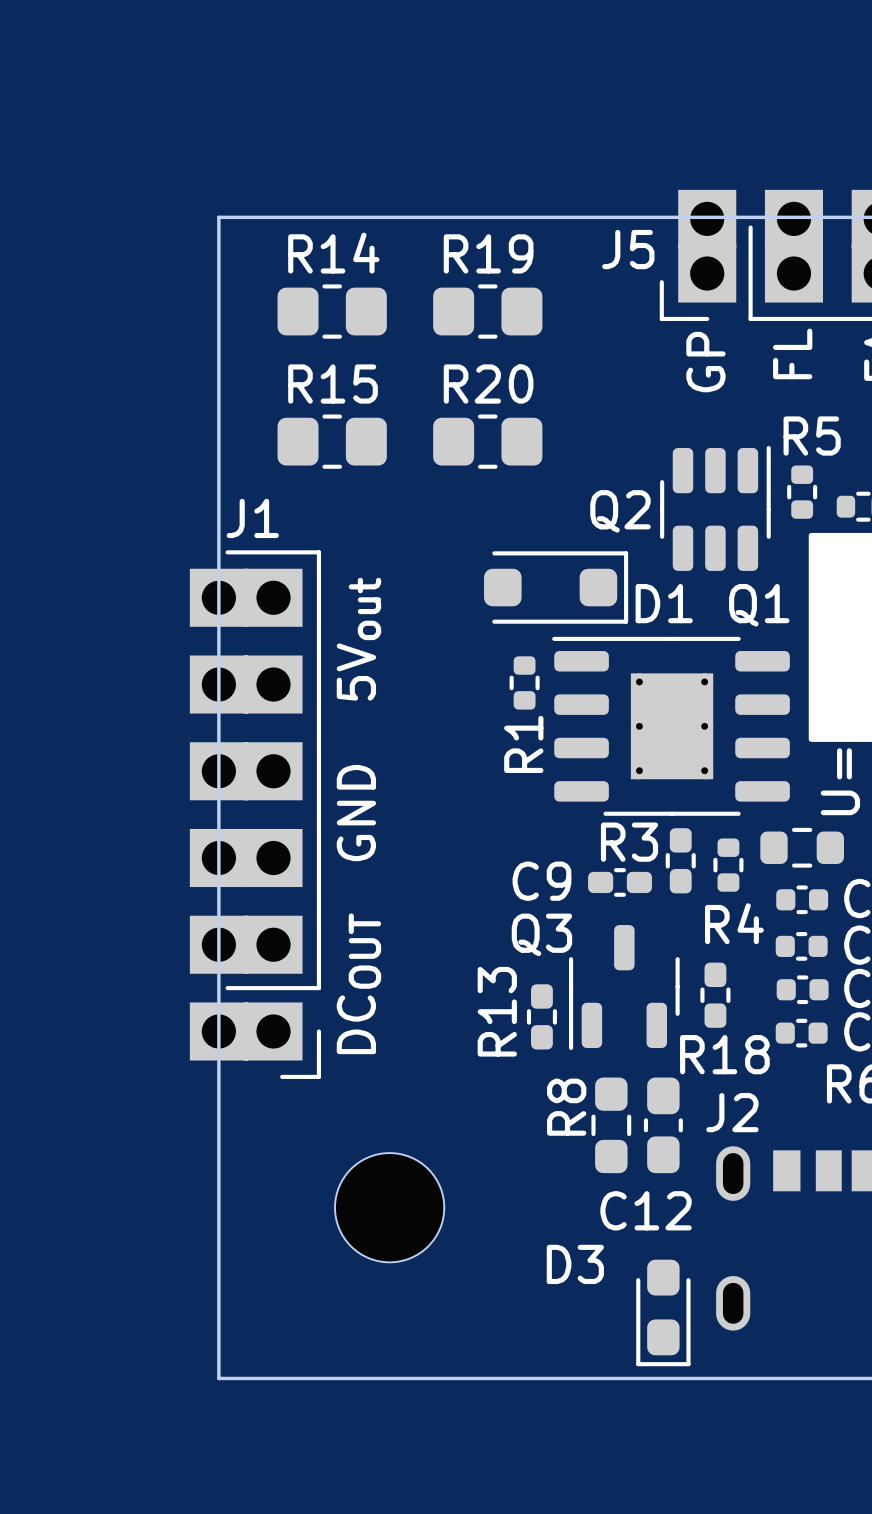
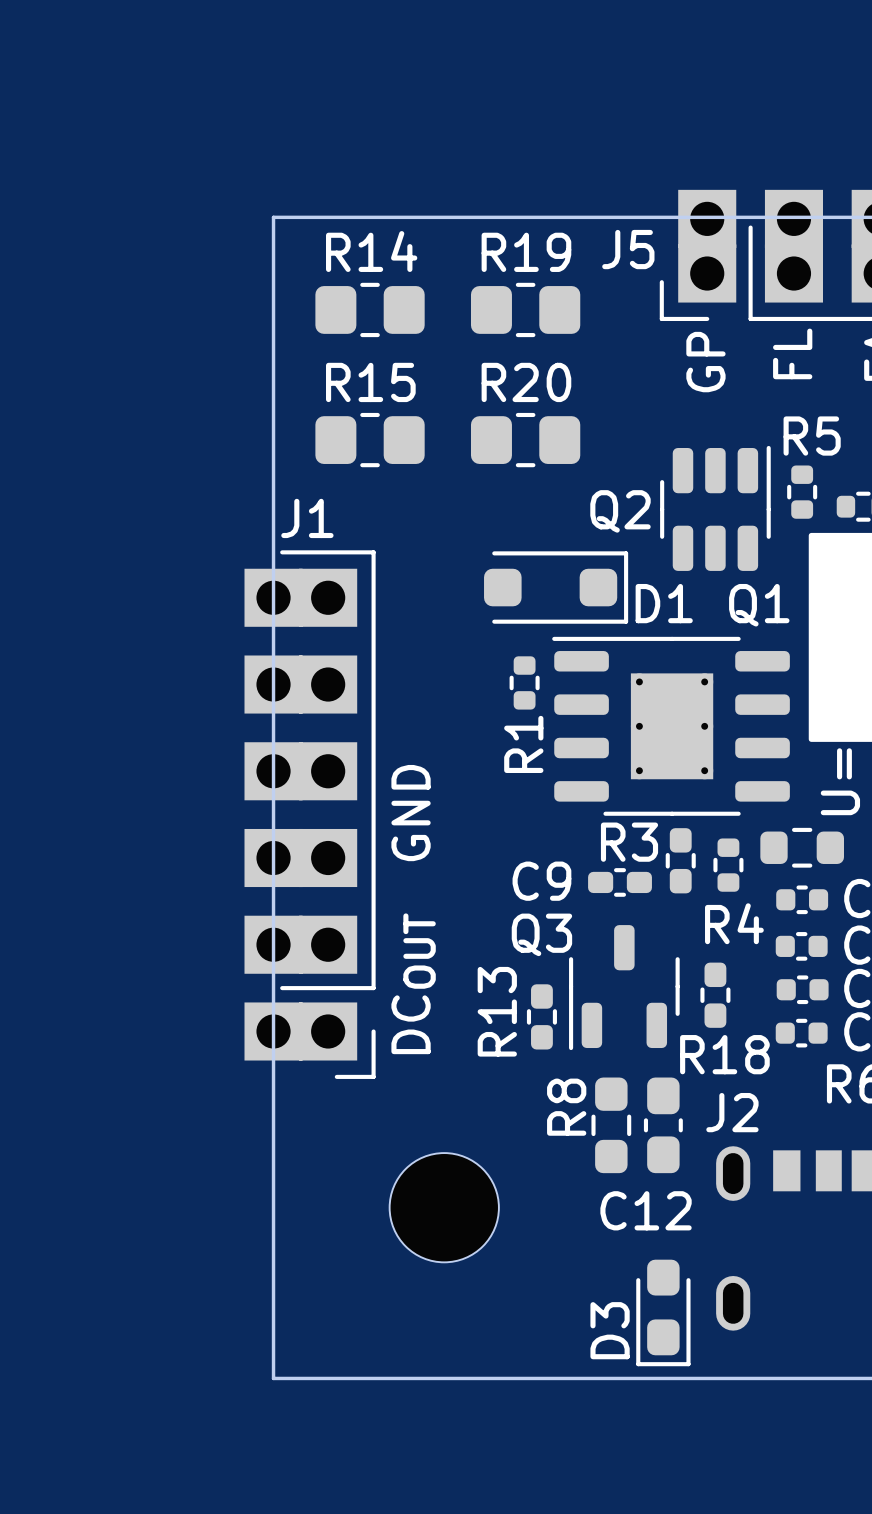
board edge: (273, 217) (218, 217) (218, 1378) (273, 1378) -> (273, 217) (273, 1378)
R14 position: (332, 311) -> (370, 309)
R19 position: (487, 311) -> (525, 309)
R15 position: (332, 441) -> (370, 440)
R20 position: (487, 441) -> (525, 440)
text: 5Vout (358, 639) -> none
text position: GND (356, 813) -> GND (411, 813)
J1 position: (255, 814) -> (310, 814)
text position: DCOUT (358, 983) -> DCOUT (413, 983)
part position: (389, 1207) -> (444, 1207)
D3 name rotation: 0° (575, 1264) -> 90° counterclockwise (610, 1330)

